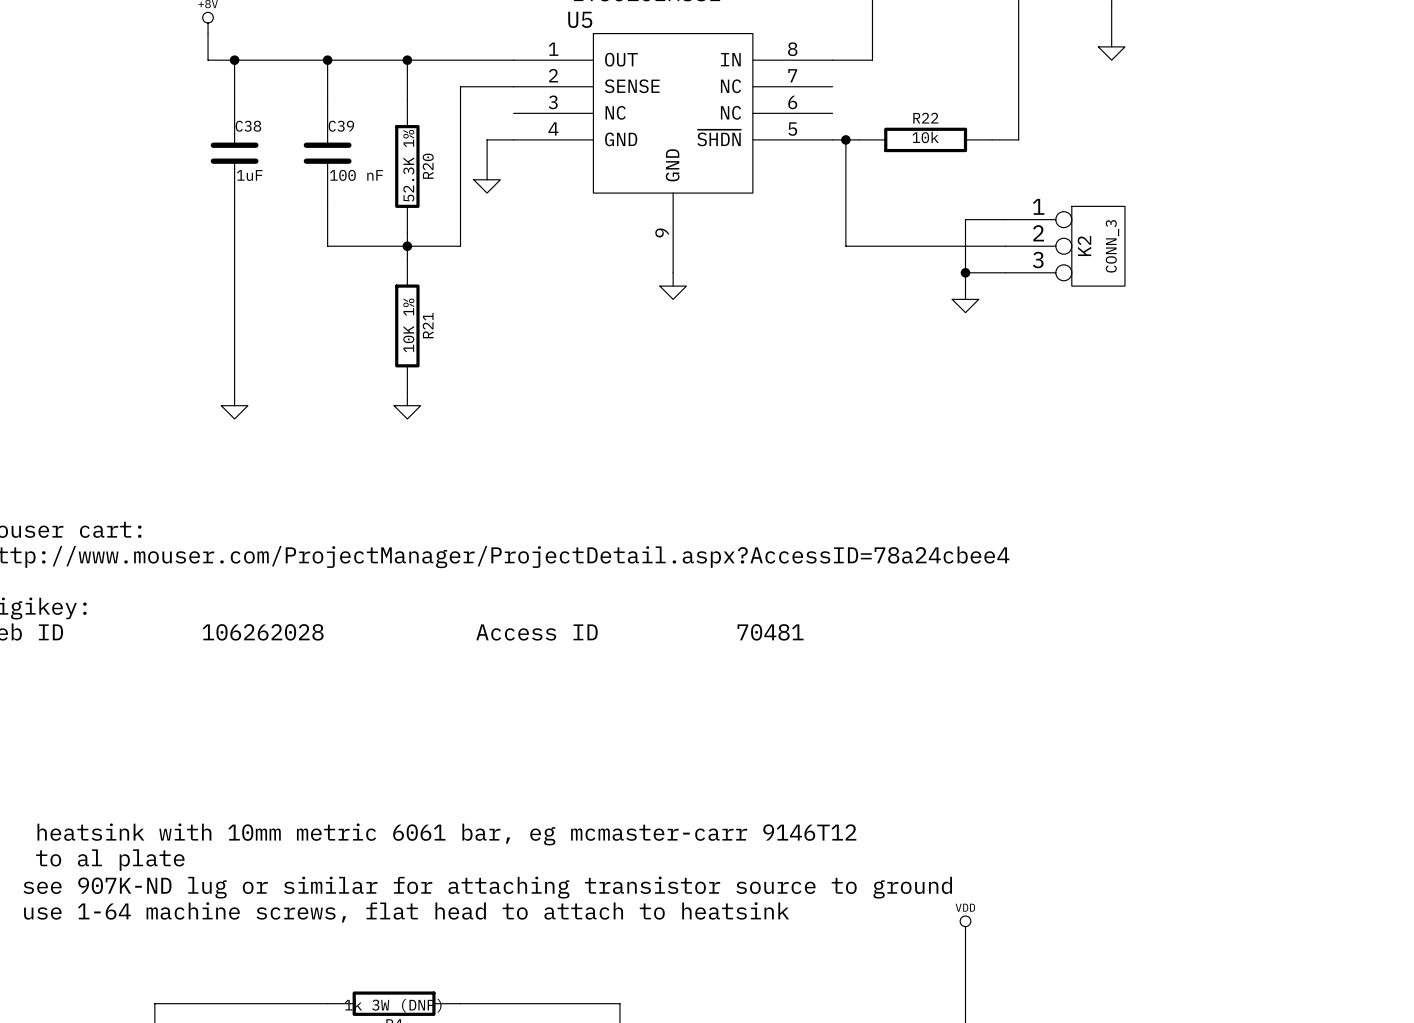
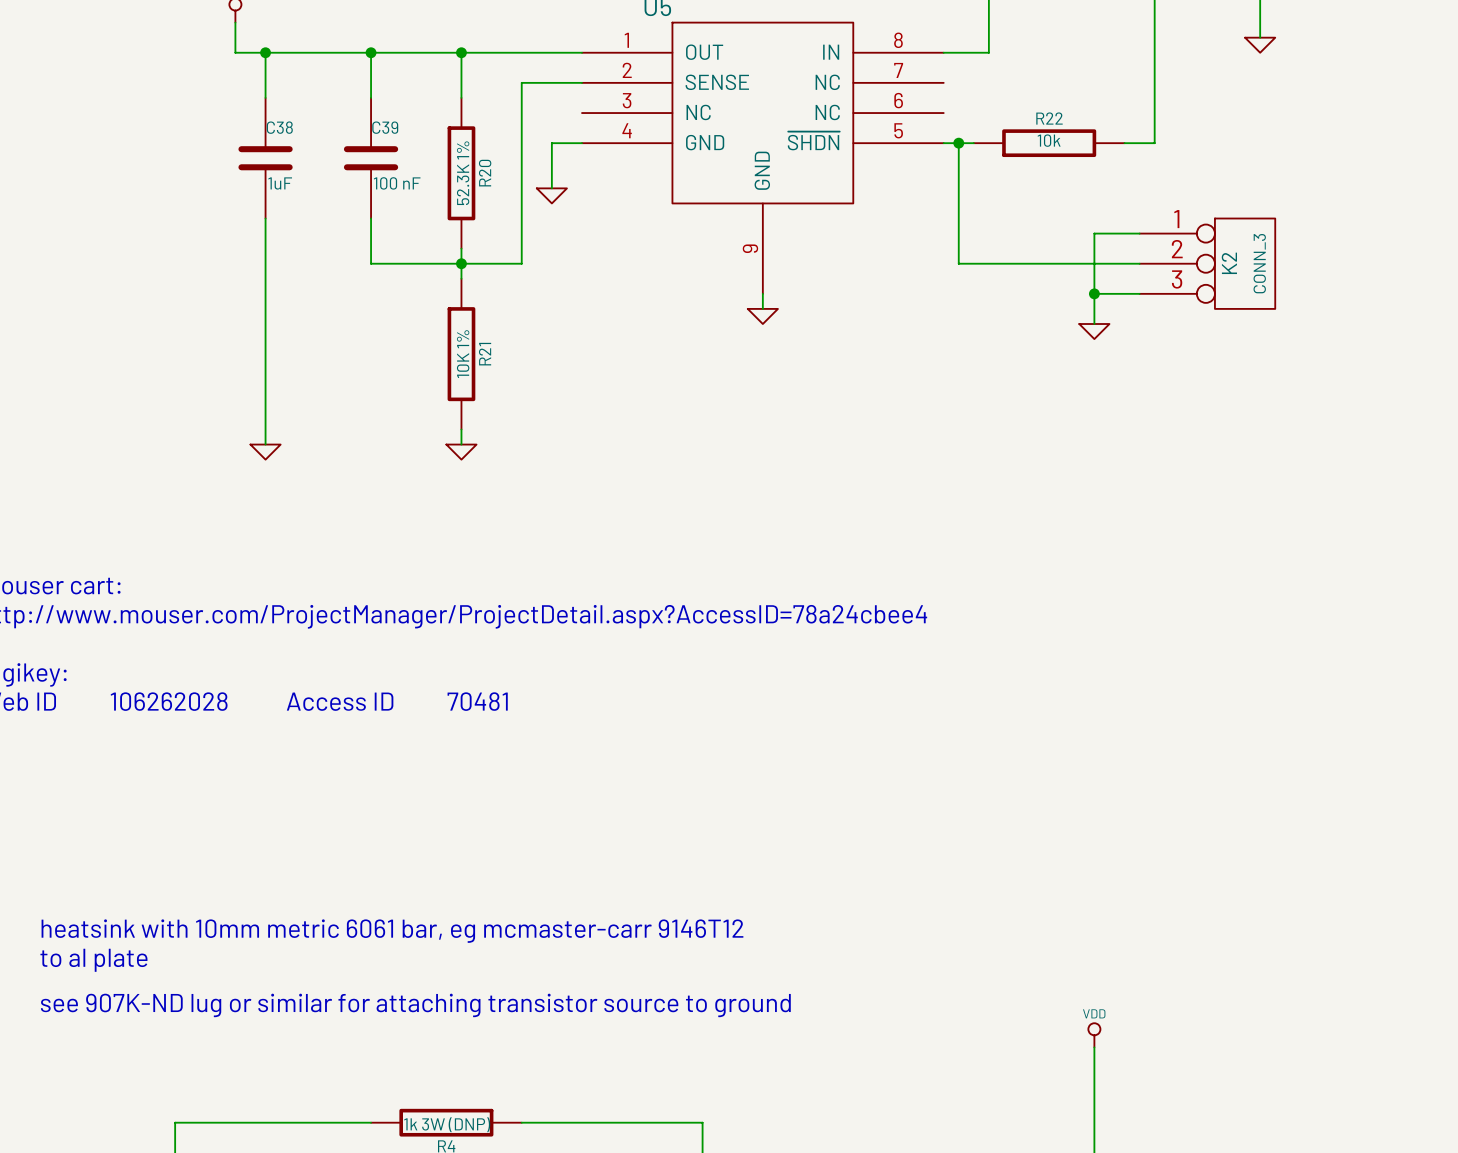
text position: see 907K-ND lug or similar for attaching transistor source to ground (487, 887) -> see 907K-ND lug or similar for attaching transistor source to ground (415, 1005)
text: use 1-64 machine screws, flat head to attach to heatsink (406, 912) -> none

